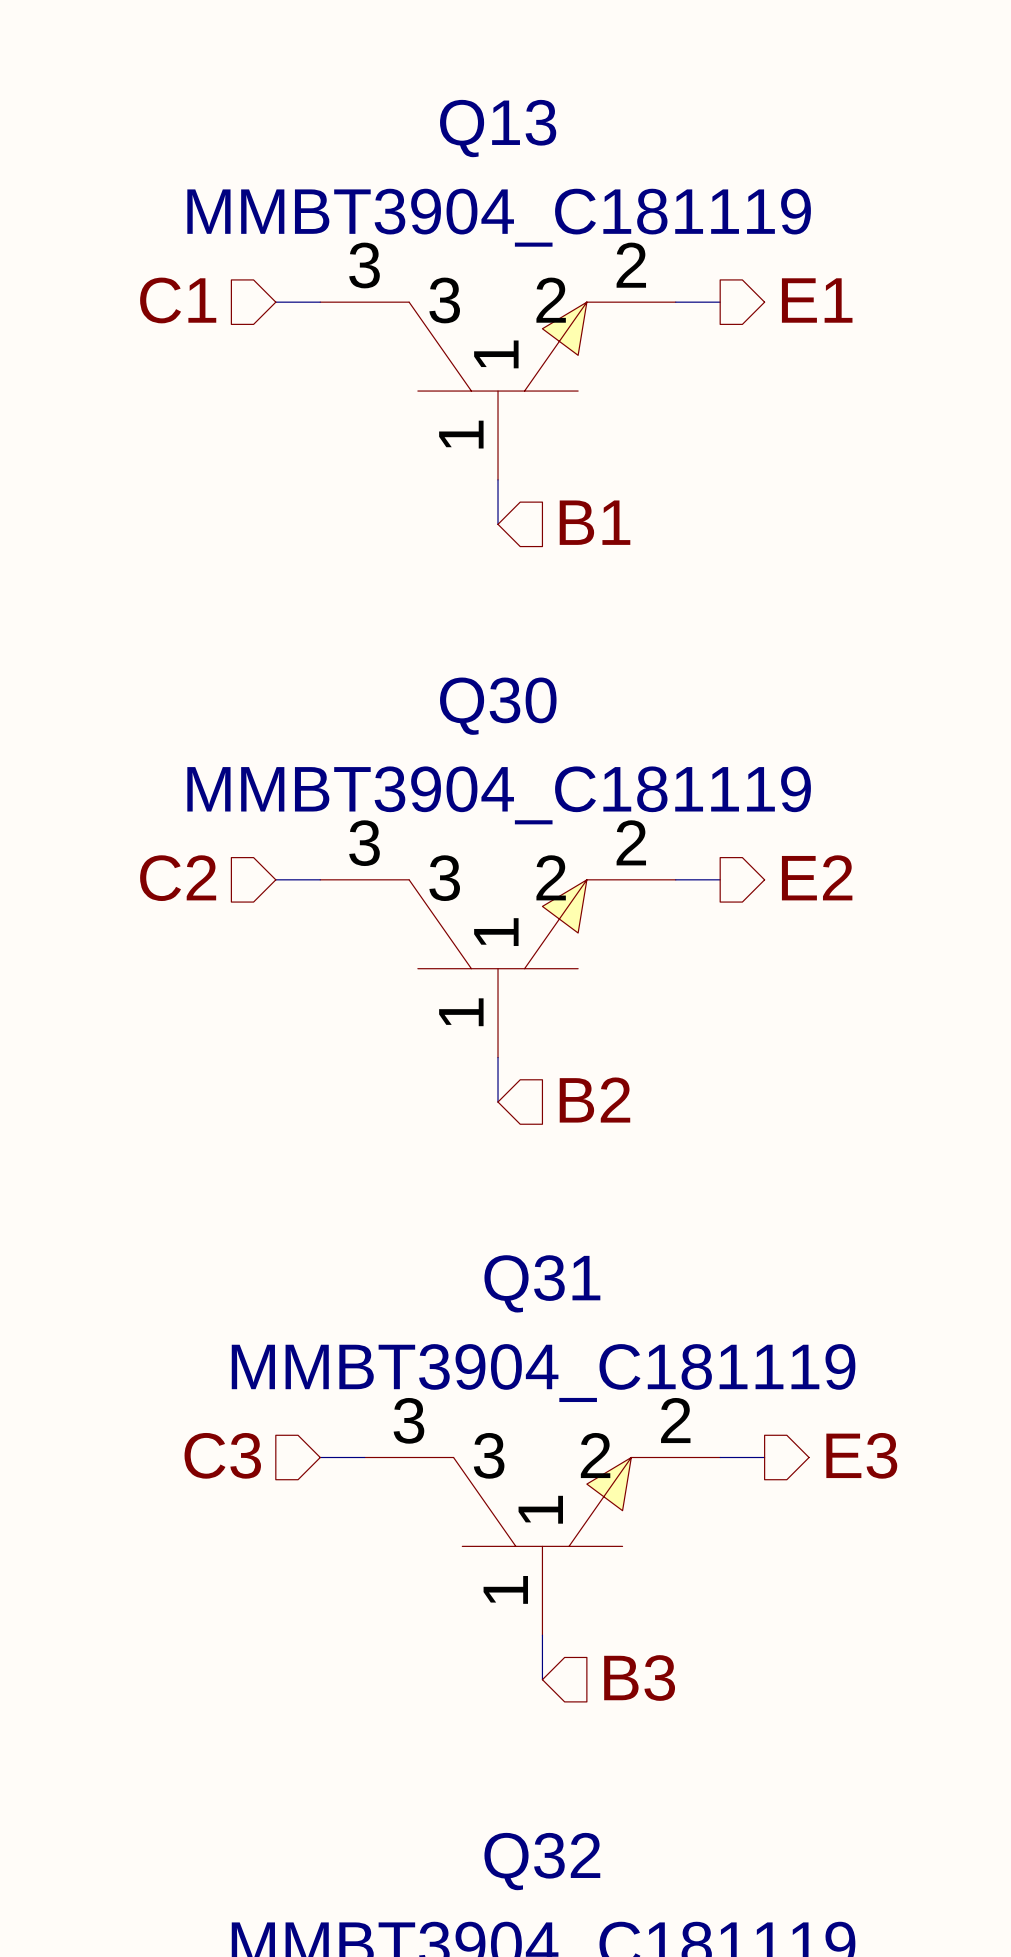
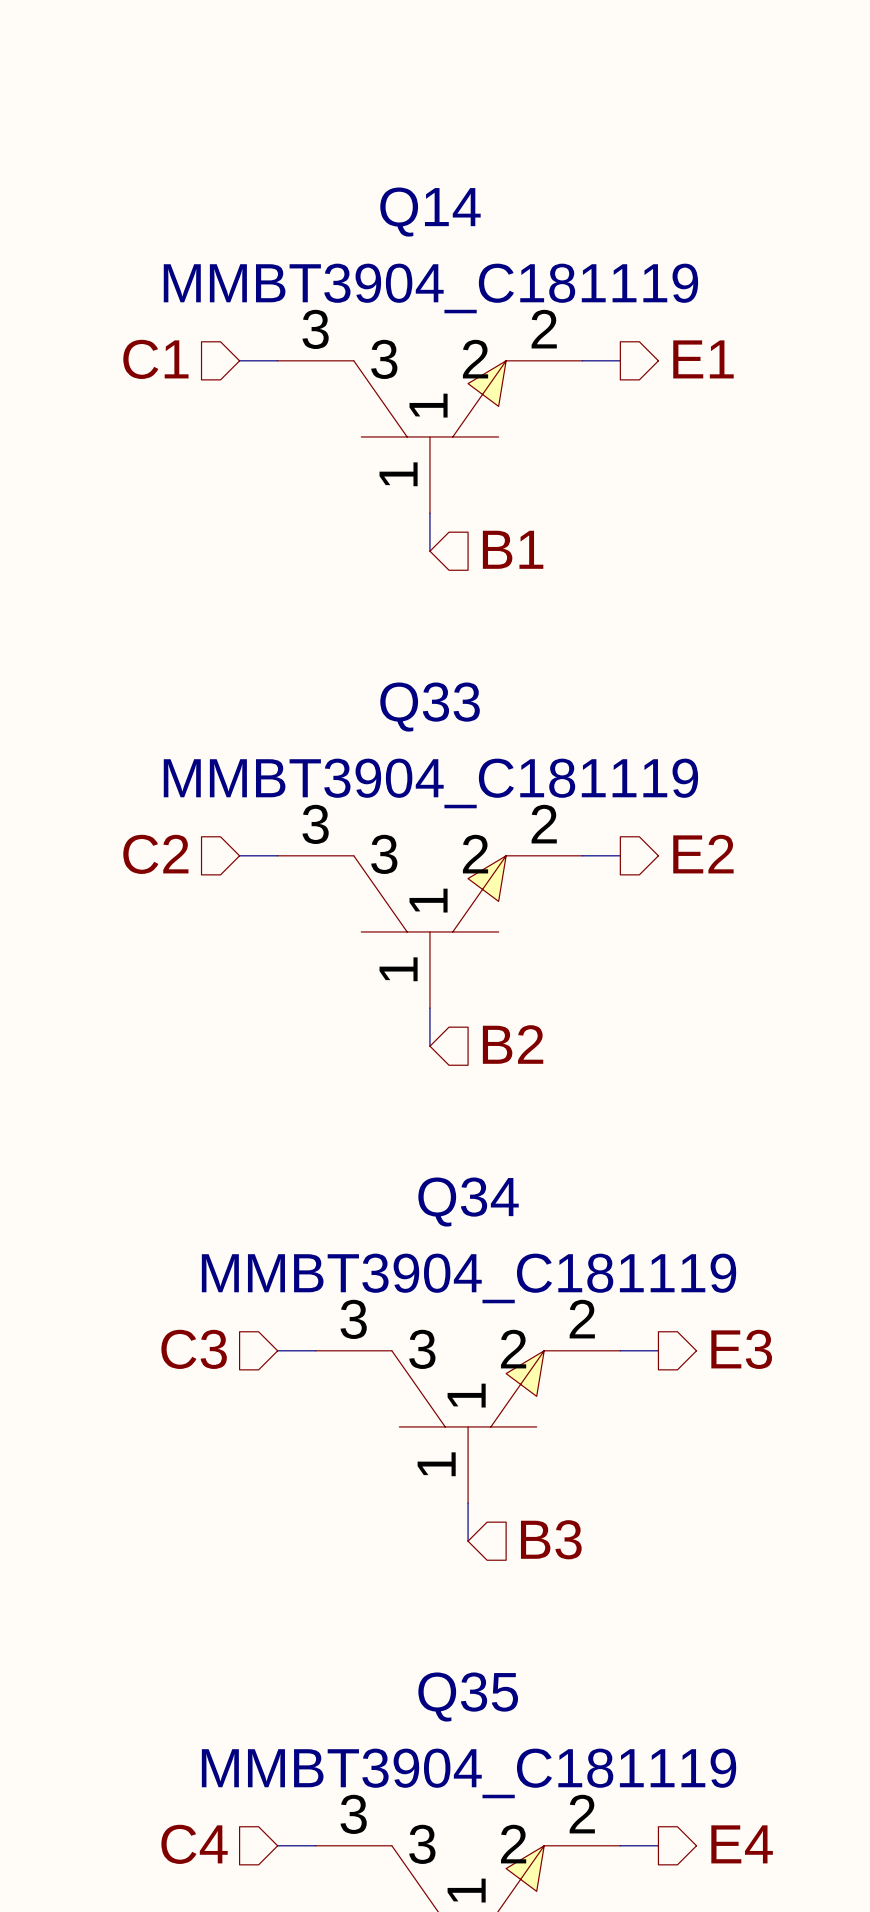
Q13 name: Q13 (498, 128) -> Q14 (430, 212)
Q30 name: Q30 (498, 706) -> Q33 (430, 707)
Q31 name: Q31 (542, 1283) -> Q34 (468, 1202)
Q32 name: Q32 (542, 1861) -> Q35 (468, 1697)

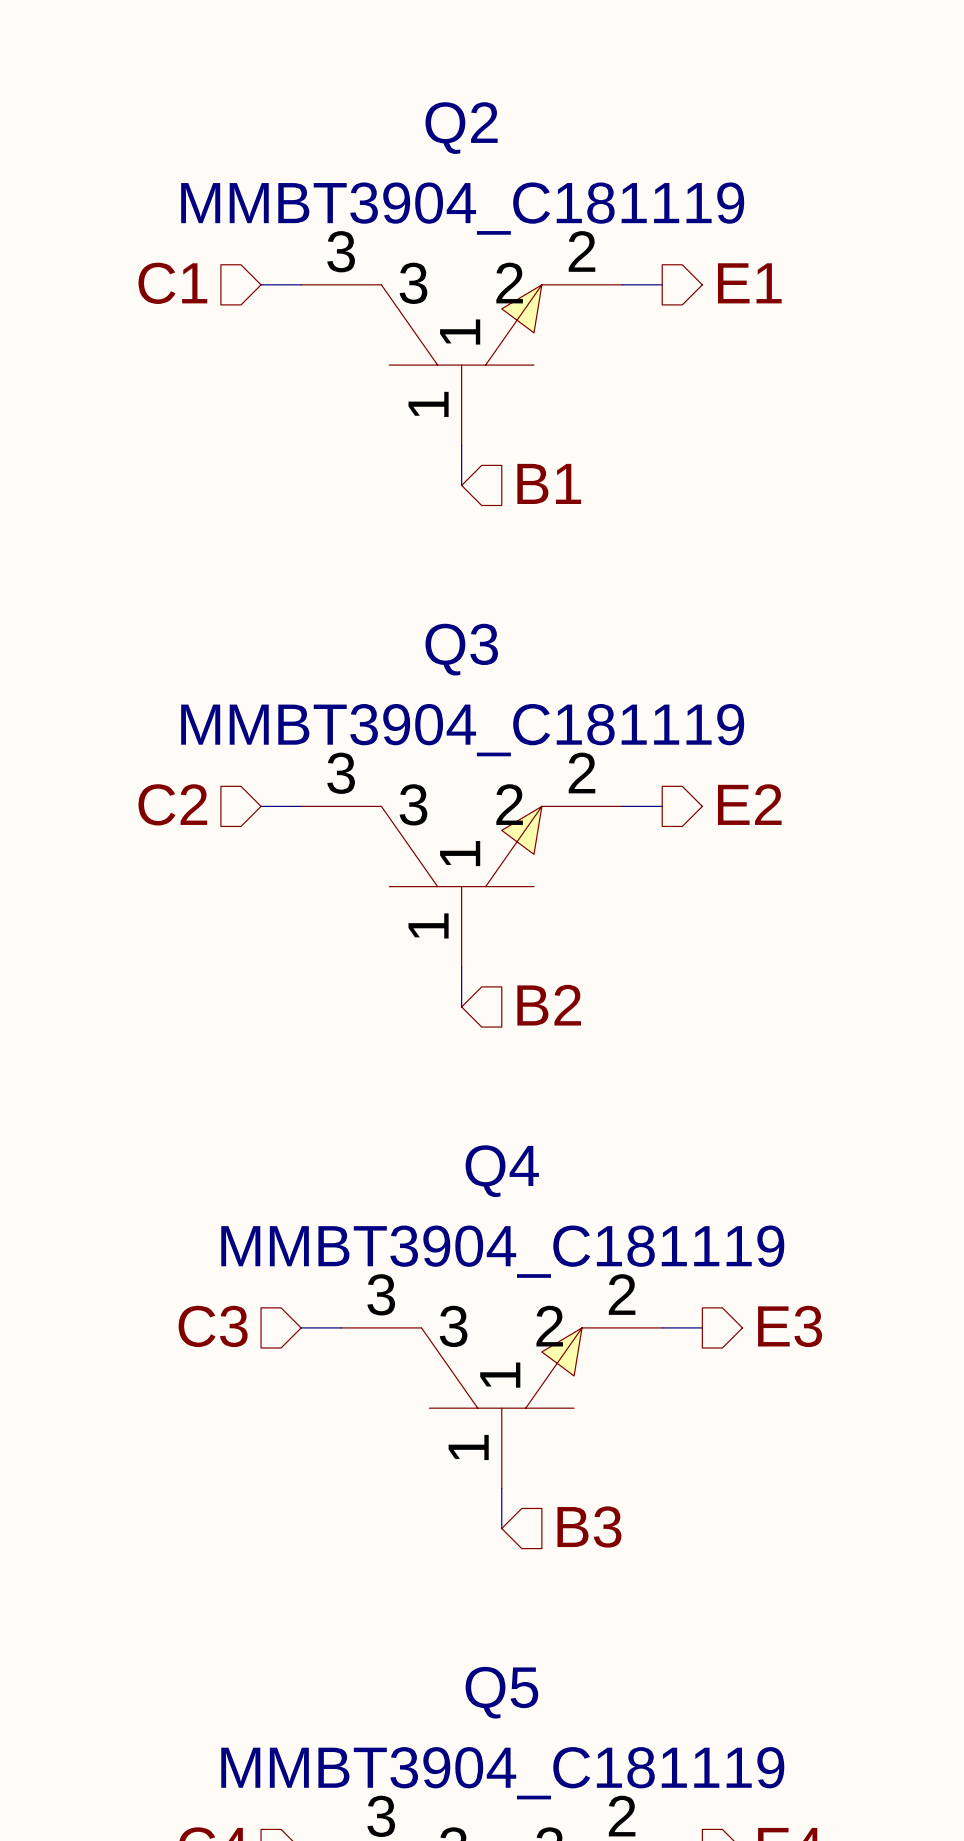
Q14 name: Q14 (430, 212) -> Q2 (461, 128)
Q33 name: Q33 (430, 707) -> Q3 (461, 649)
Q34 name: Q34 (468, 1202) -> Q4 (502, 1171)
Q35 name: Q35 (468, 1697) -> Q5 (501, 1692)

